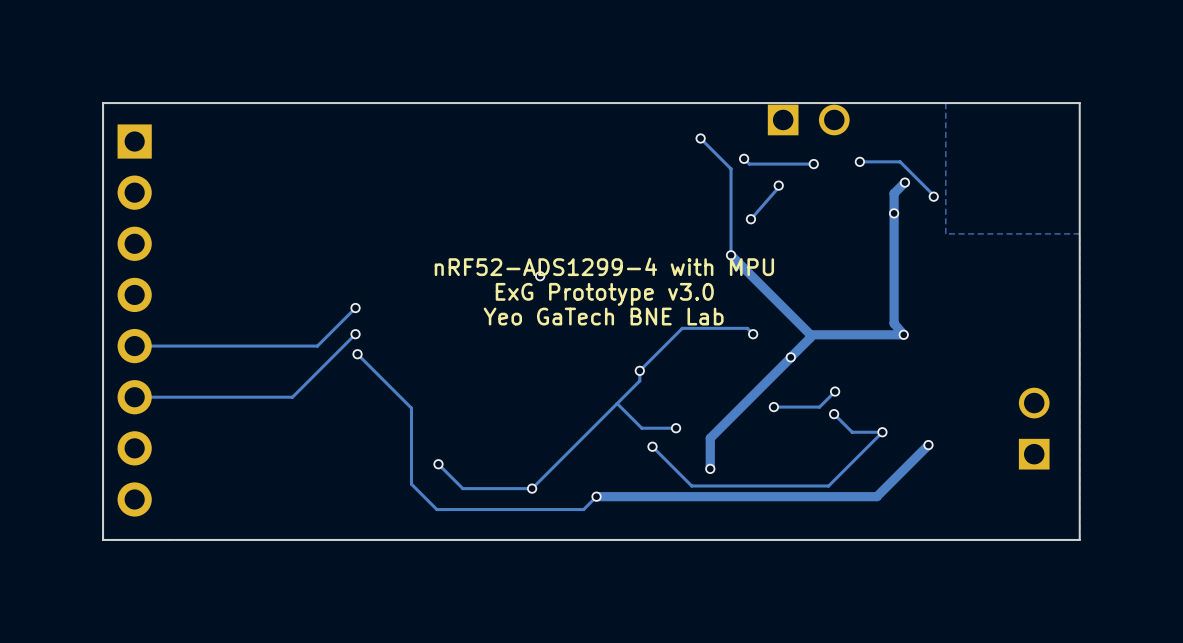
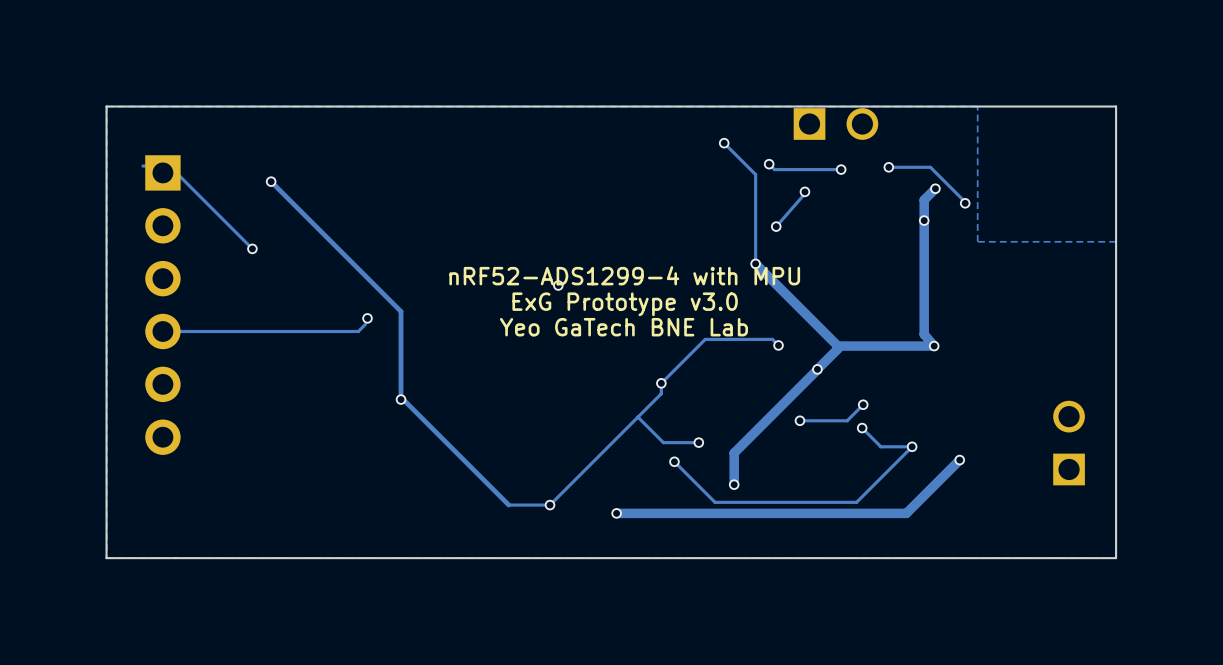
track: none -> (142, 166) (169, 166) (252, 248)
via: none -> (271, 181)
via: none -> (252, 248)
part: none -> (162, 305)
track: (355, 308) (317, 346) (134, 346) -> none
track: none -> (365, 324) (358, 331) (162, 331)
part: (134, 320) -> none
track: (355, 334) (292, 397) (134, 397) -> none
via: (355, 334) -> none
track: (357, 354) (411, 408) (411, 484) (436, 509) (583, 509) (596, 496) -> none
via: (357, 354) -> none
via: none -> (401, 399)
track: (438, 464) (462, 488) (492, 488) -> (271, 181) (401, 311) (401, 399) (403, 399) (508, 505)
via: (438, 464) -> none

